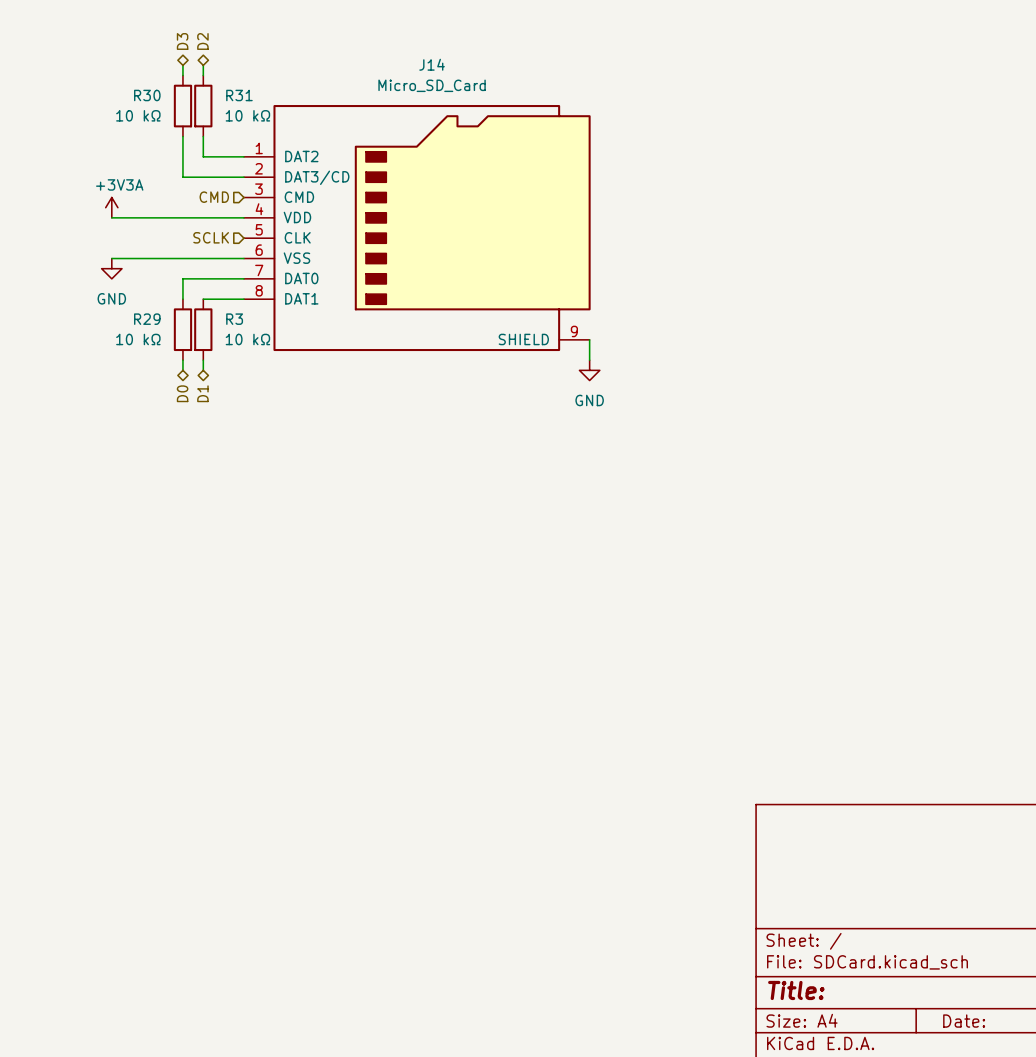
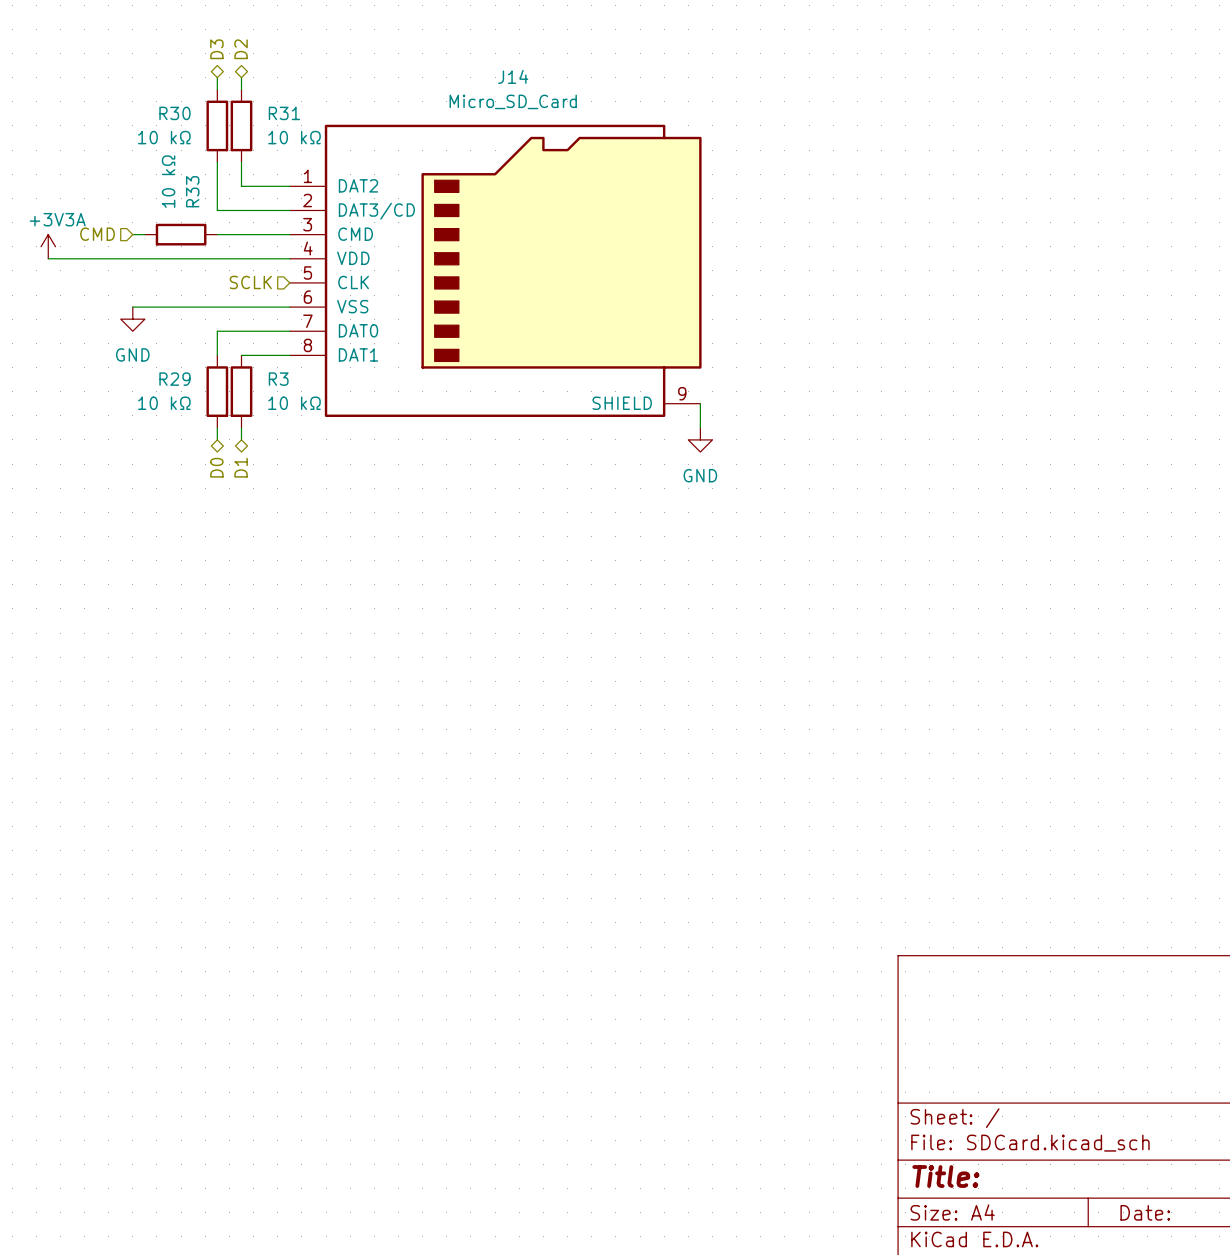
wire: none -> (132, 234) (144, 234)
R33: none -> 10 kΩ (181, 234)
wire: none -> (217, 234) (289, 234)
hierarchical label position: CMD (214, 197) -> CMD (97, 234)
power symbol position: +3V3A (111, 207) -> +3V3A (48, 246)
wire: none -> (48, 258) (132, 258)

